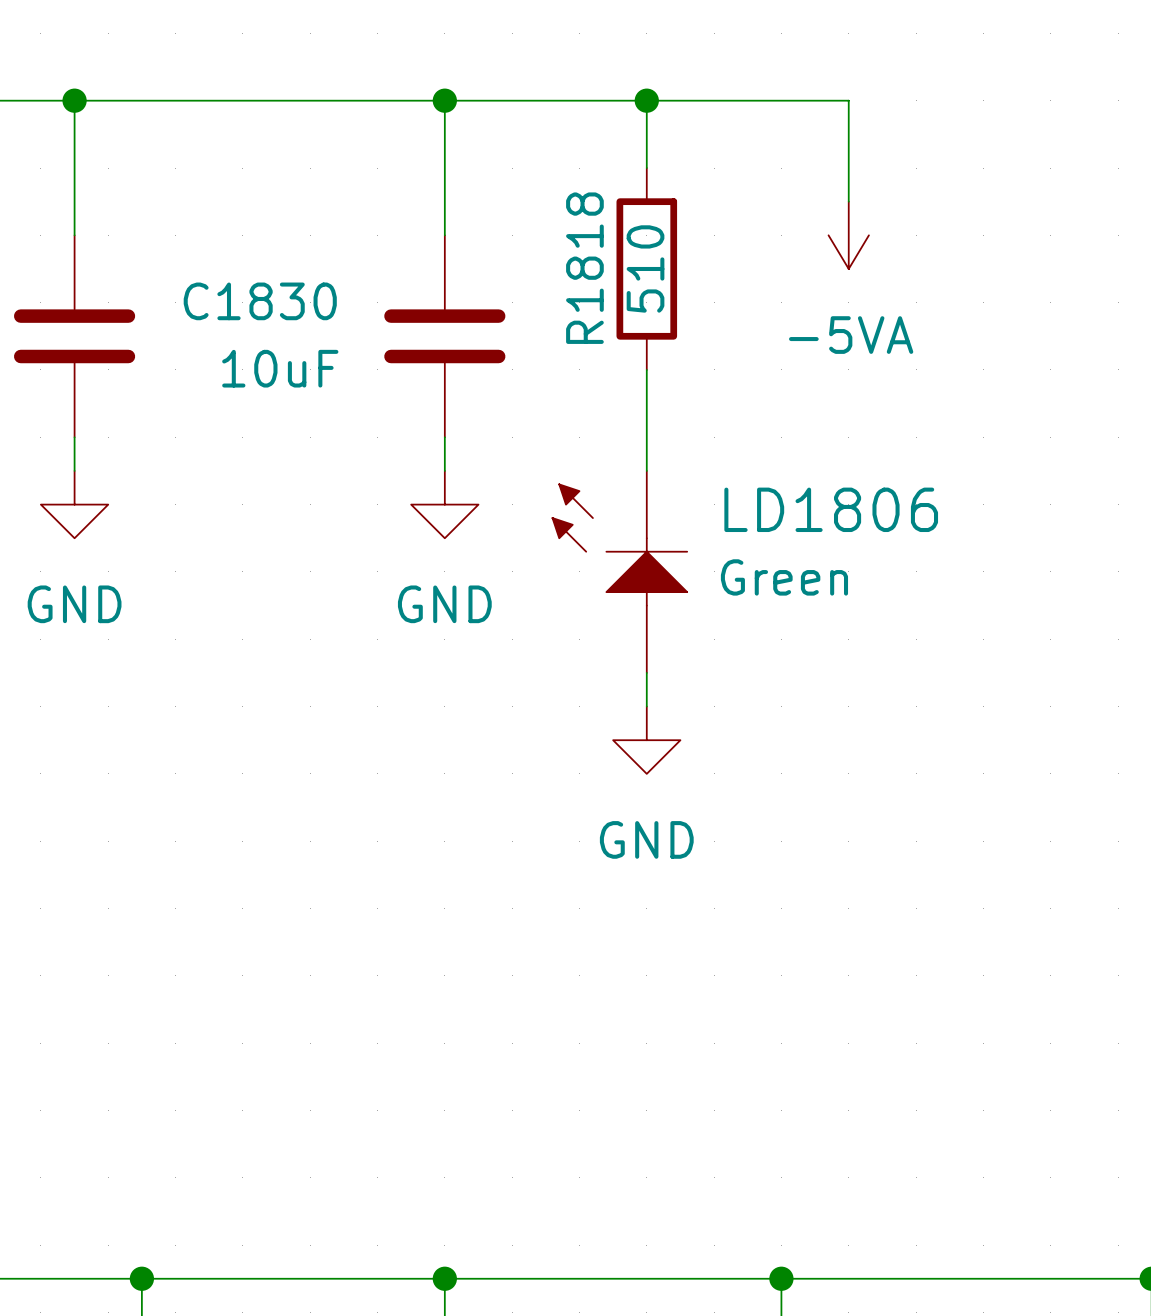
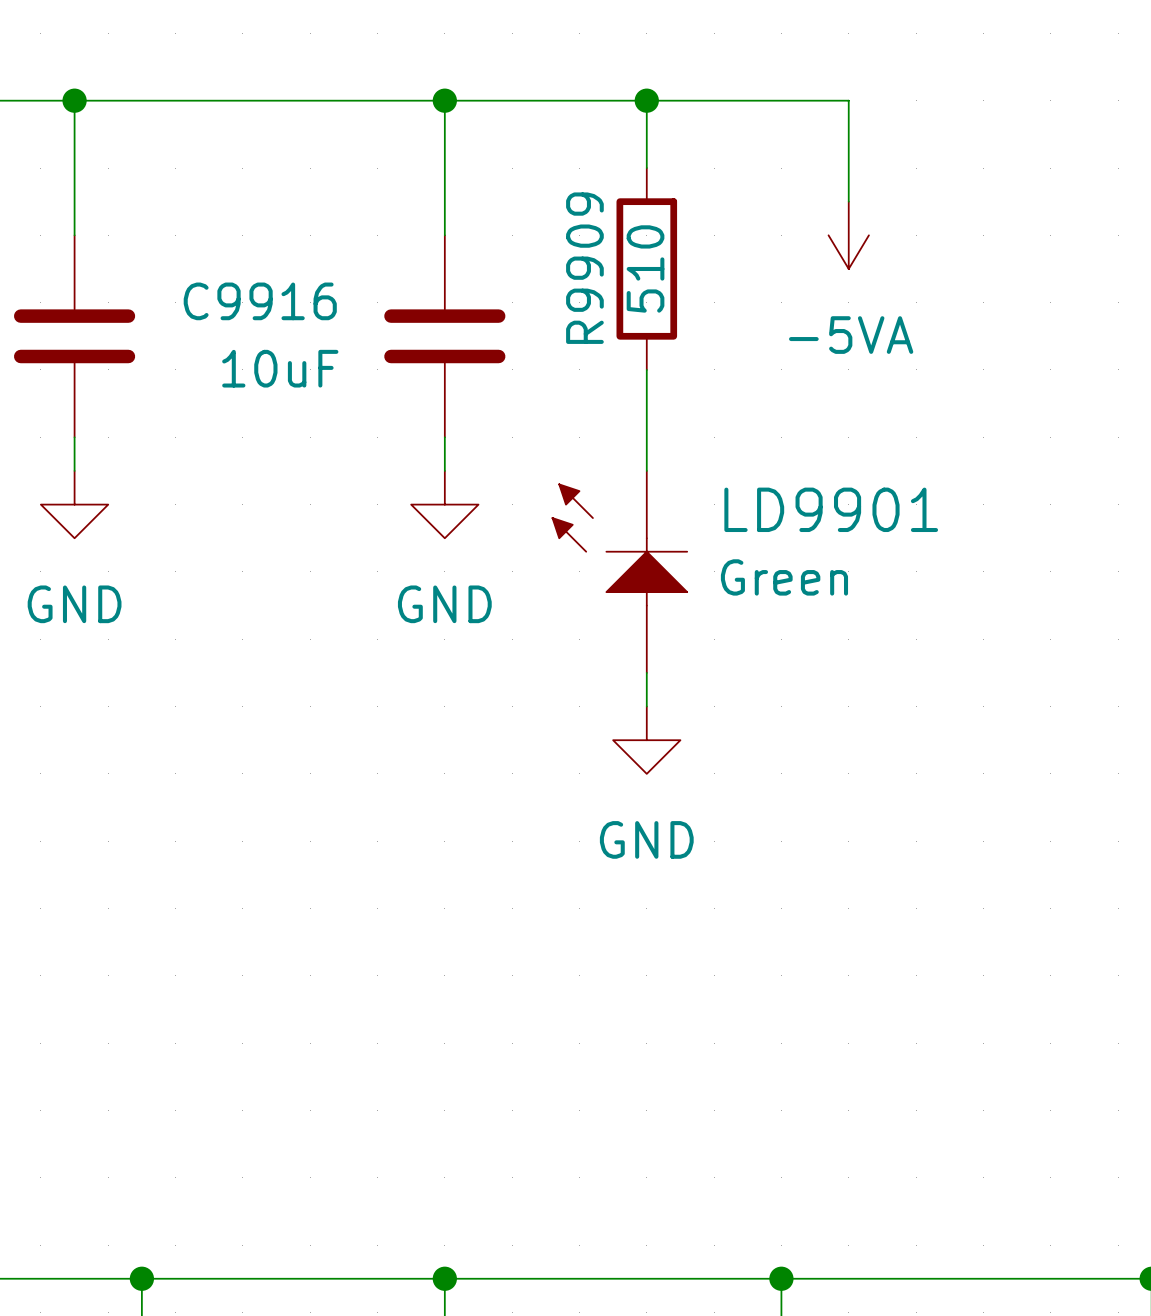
R1818 name: R1818 (584, 268) -> R9909 (584, 268)
C1830 name: C1830 (260, 301) -> C9916 (260, 301)
LD1806 name: LD1806 (831, 509) -> LD9901 (831, 509)

